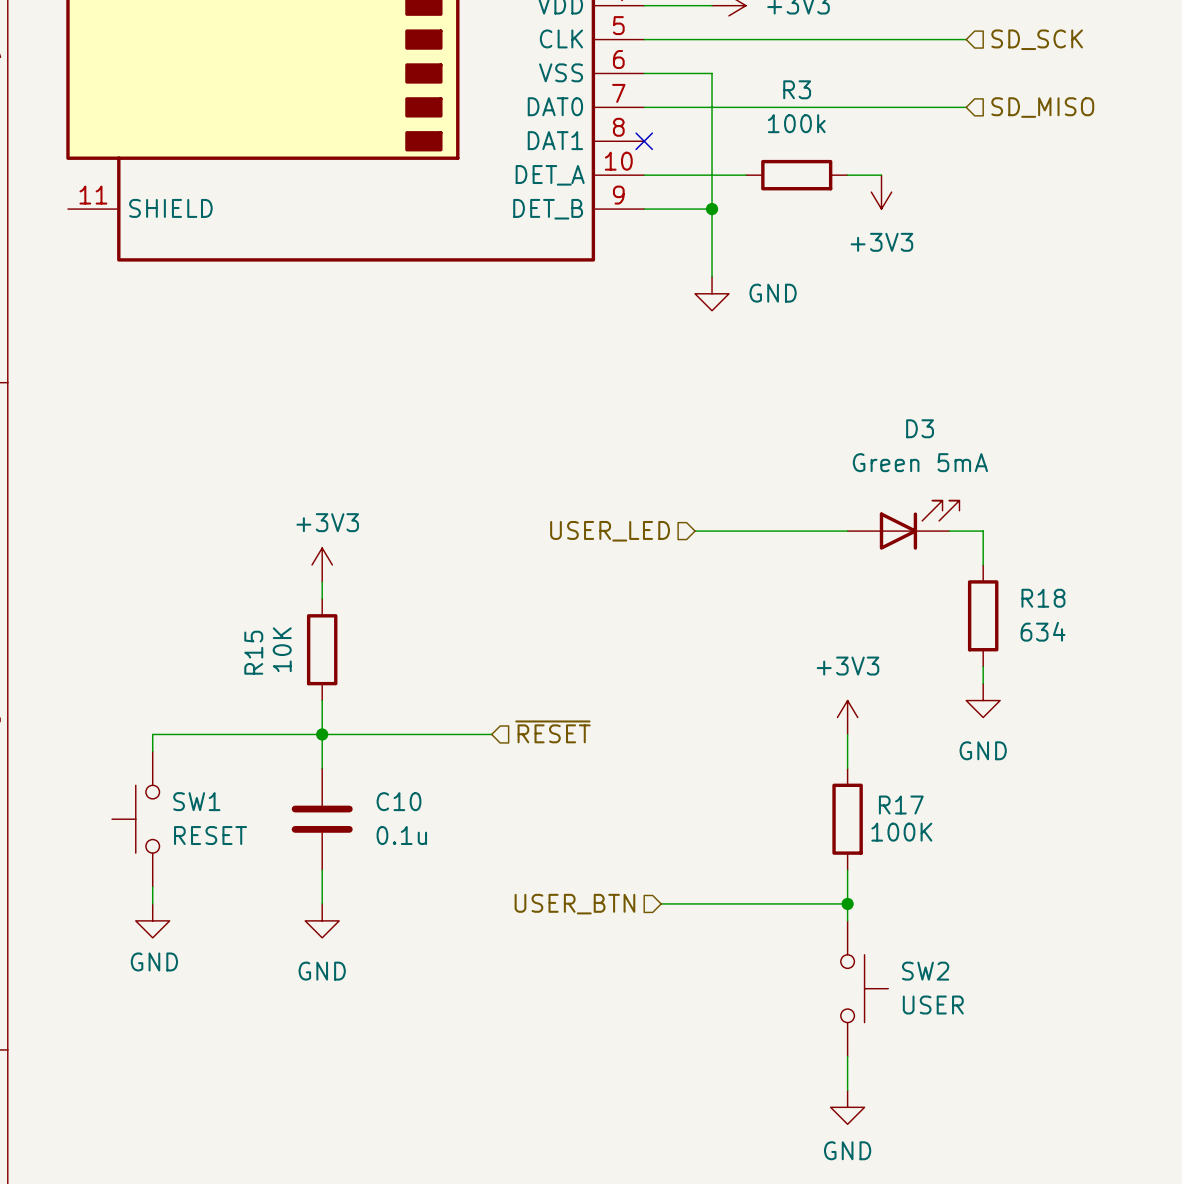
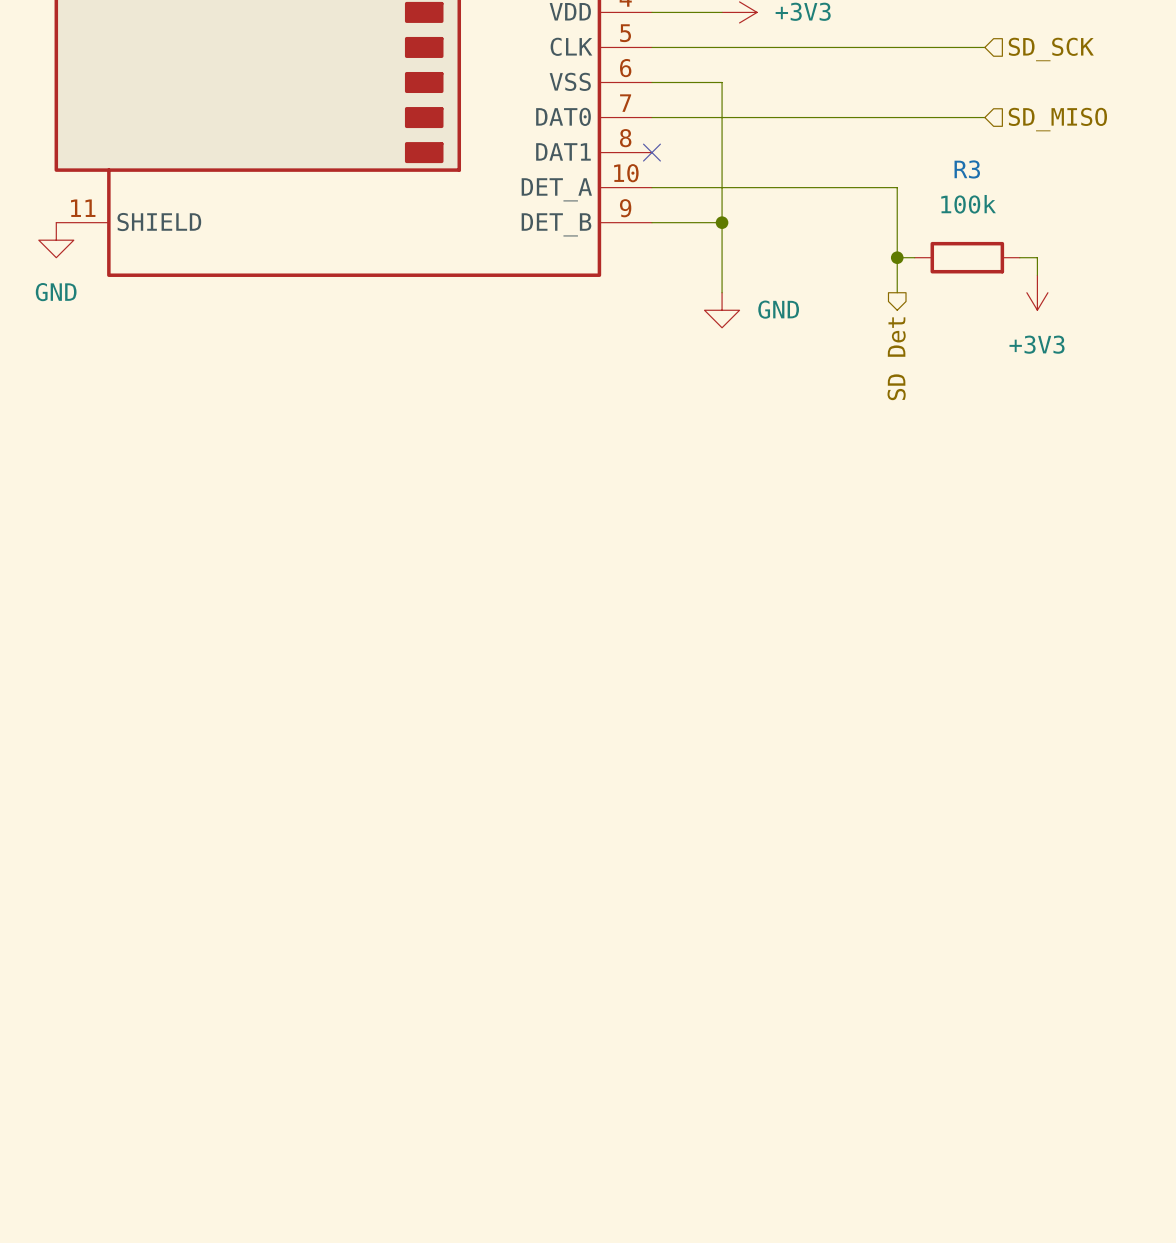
wire: none -> (757, 187) (862, 187)
R3 position: (796, 175) -> (967, 257)
wire: none -> (897, 187) (897, 292)
power symbol position: +3V3 (881, 192) -> +3V3 (1037, 292)
power symbol: none -> GND (56, 240)
wire: none -> (897, 257) (914, 257)
junction: none -> (897, 257)
wire: none -> (1019, 257) (1037, 257) (1037, 275)
hierarchical label: none -> SD Det (896, 358)
D3: Green 5mA (903, 525) -> none
hierarchical label: USER_LED (610, 531) -> none
wire: (695, 531) (847, 531) -> none
wire: (949, 531) (983, 531) (983, 564) -> none
power symbol: +3V3 (322, 564) -> none
wire: (322, 581) (322, 598) -> none
R18: 634 (983, 615) -> none
R15: 10K (322, 649) -> none
wire: (983, 666) (983, 683) -> none
wire: (322, 700) (322, 768) -> none
power symbol: GND (983, 700) -> none
power symbol: +3V3 (847, 717) -> none
hierarchical label: ~{RESET} (552, 731) -> none
junction: (322, 734) -> none
wire: (491, 734) (152, 734) (152, 751) -> none
wire: (847, 734) (847, 768) -> none
SW1: RESET (135, 819) -> none
C10: 0.1u (322, 819) -> none
R17: 100K (847, 819) -> none
wire: (322, 870) (322, 903) -> none
wire: (847, 870) (847, 920) -> none
wire: (152, 887) (152, 903) -> none
wire: (661, 903) (847, 903) -> none
junction: (847, 903) -> none
hierarchical label: USER_BTN (574, 904) -> none
power symbol: GND (152, 920) -> none
power symbol: GND (322, 920) -> none
SW2: USER (864, 988) -> none
wire: (847, 1056) (847, 1090) -> none
power symbol: GND (847, 1107) -> none

